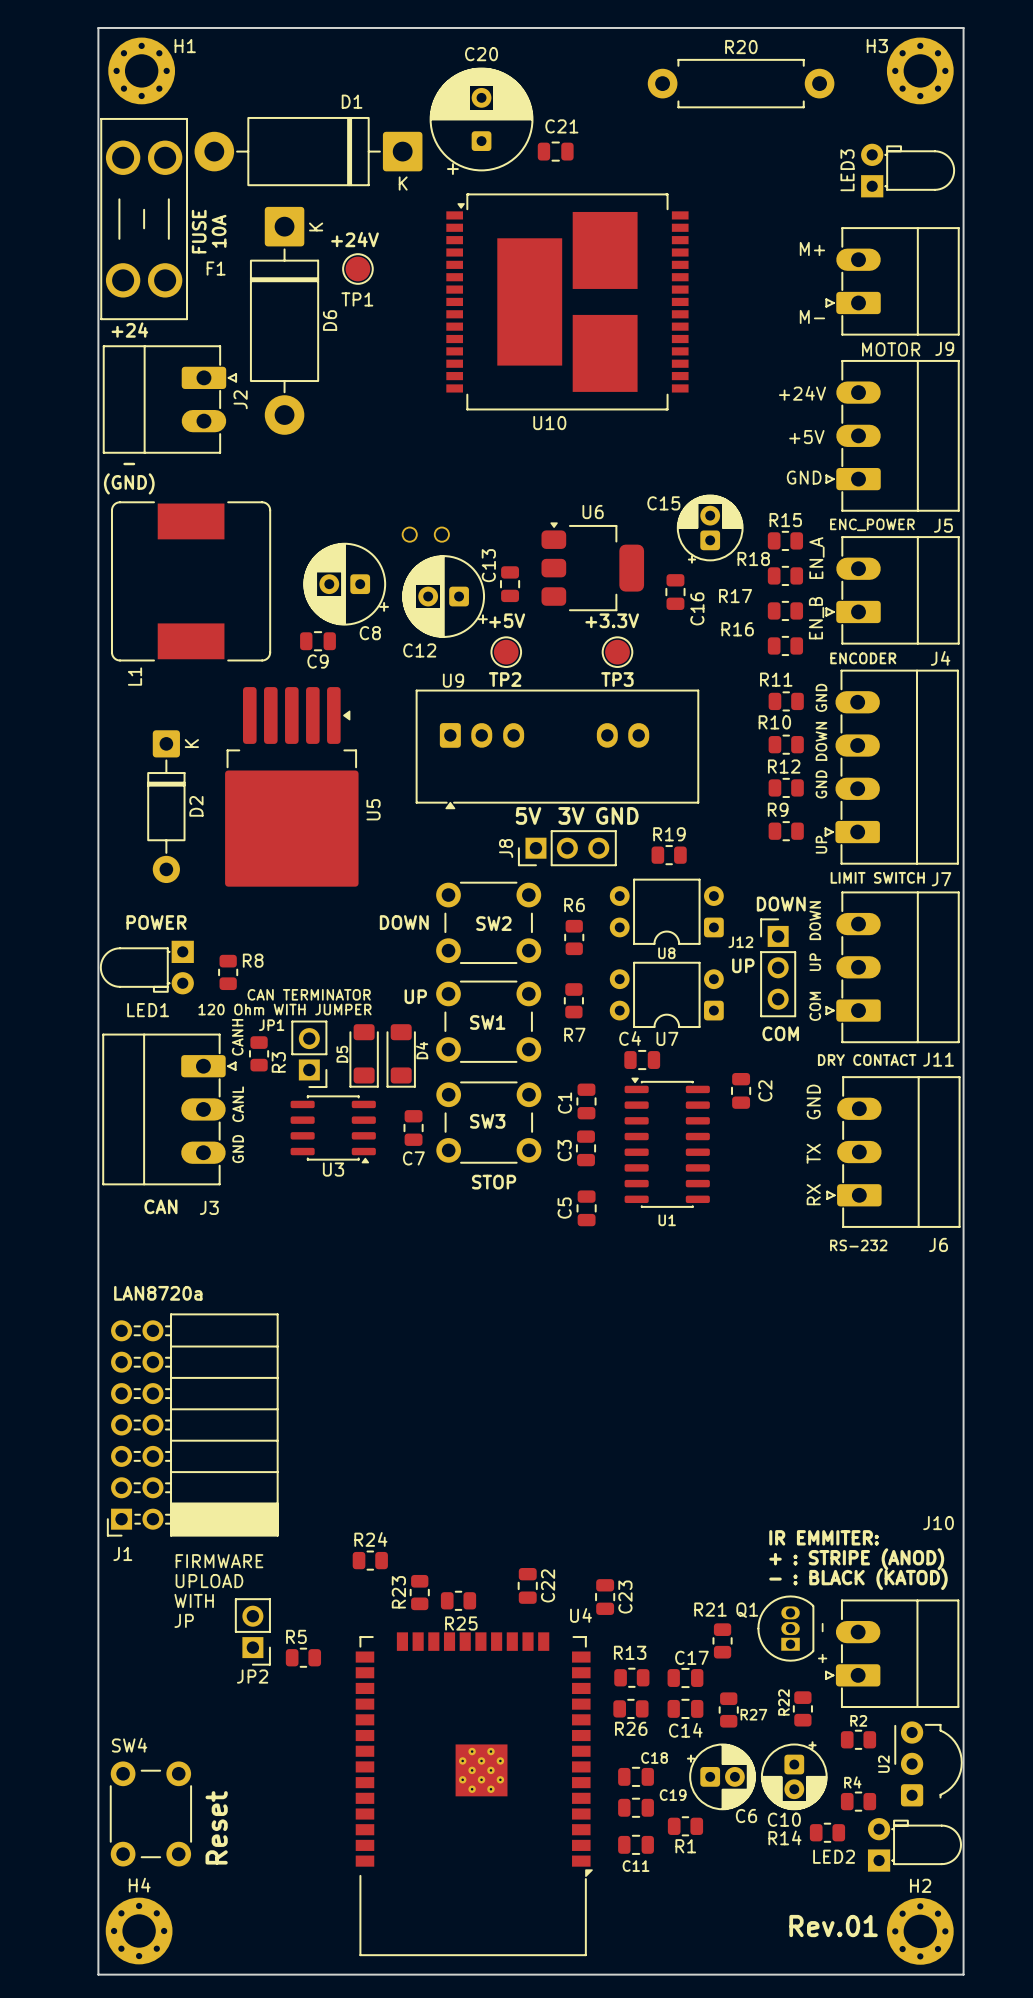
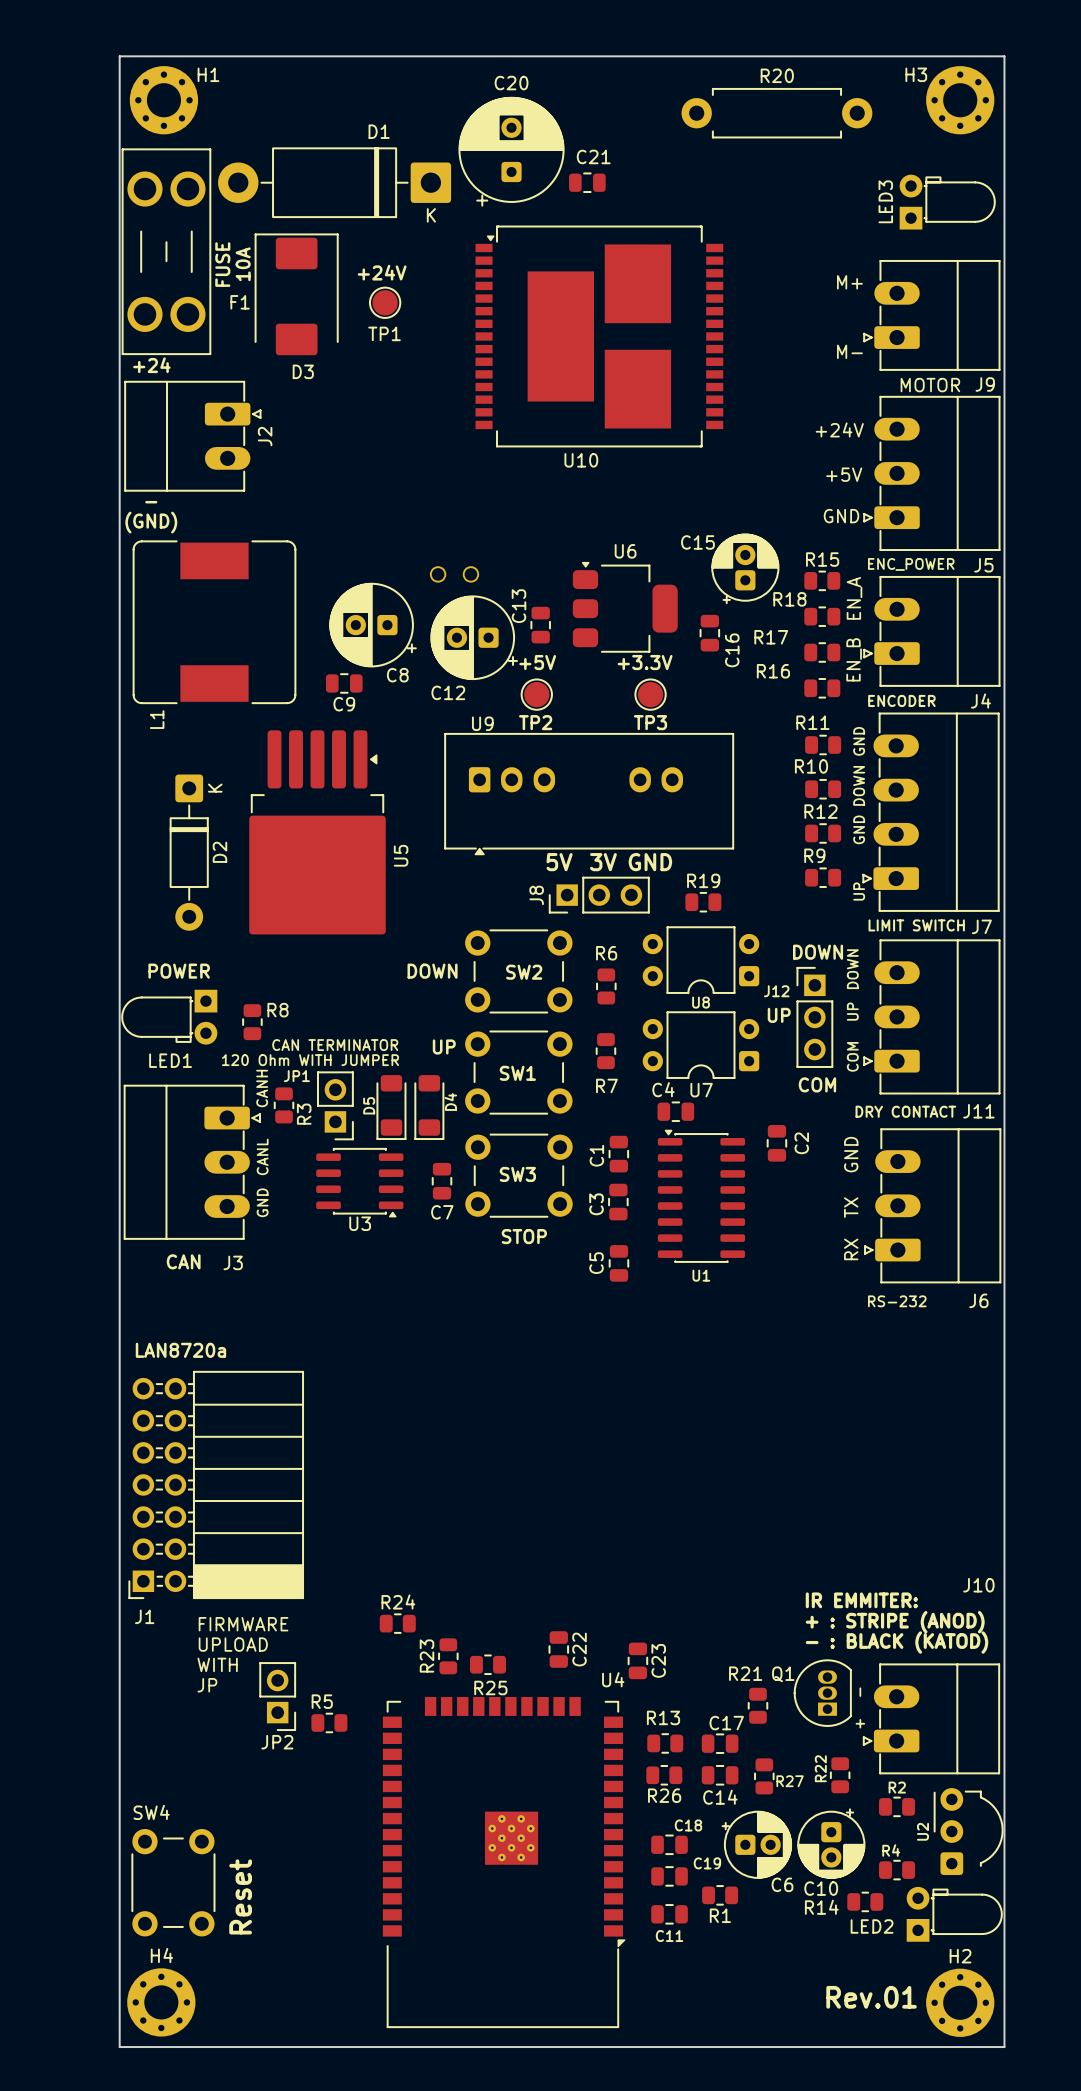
D3: none -> (296, 294)
D6: (284, 320) -> none

